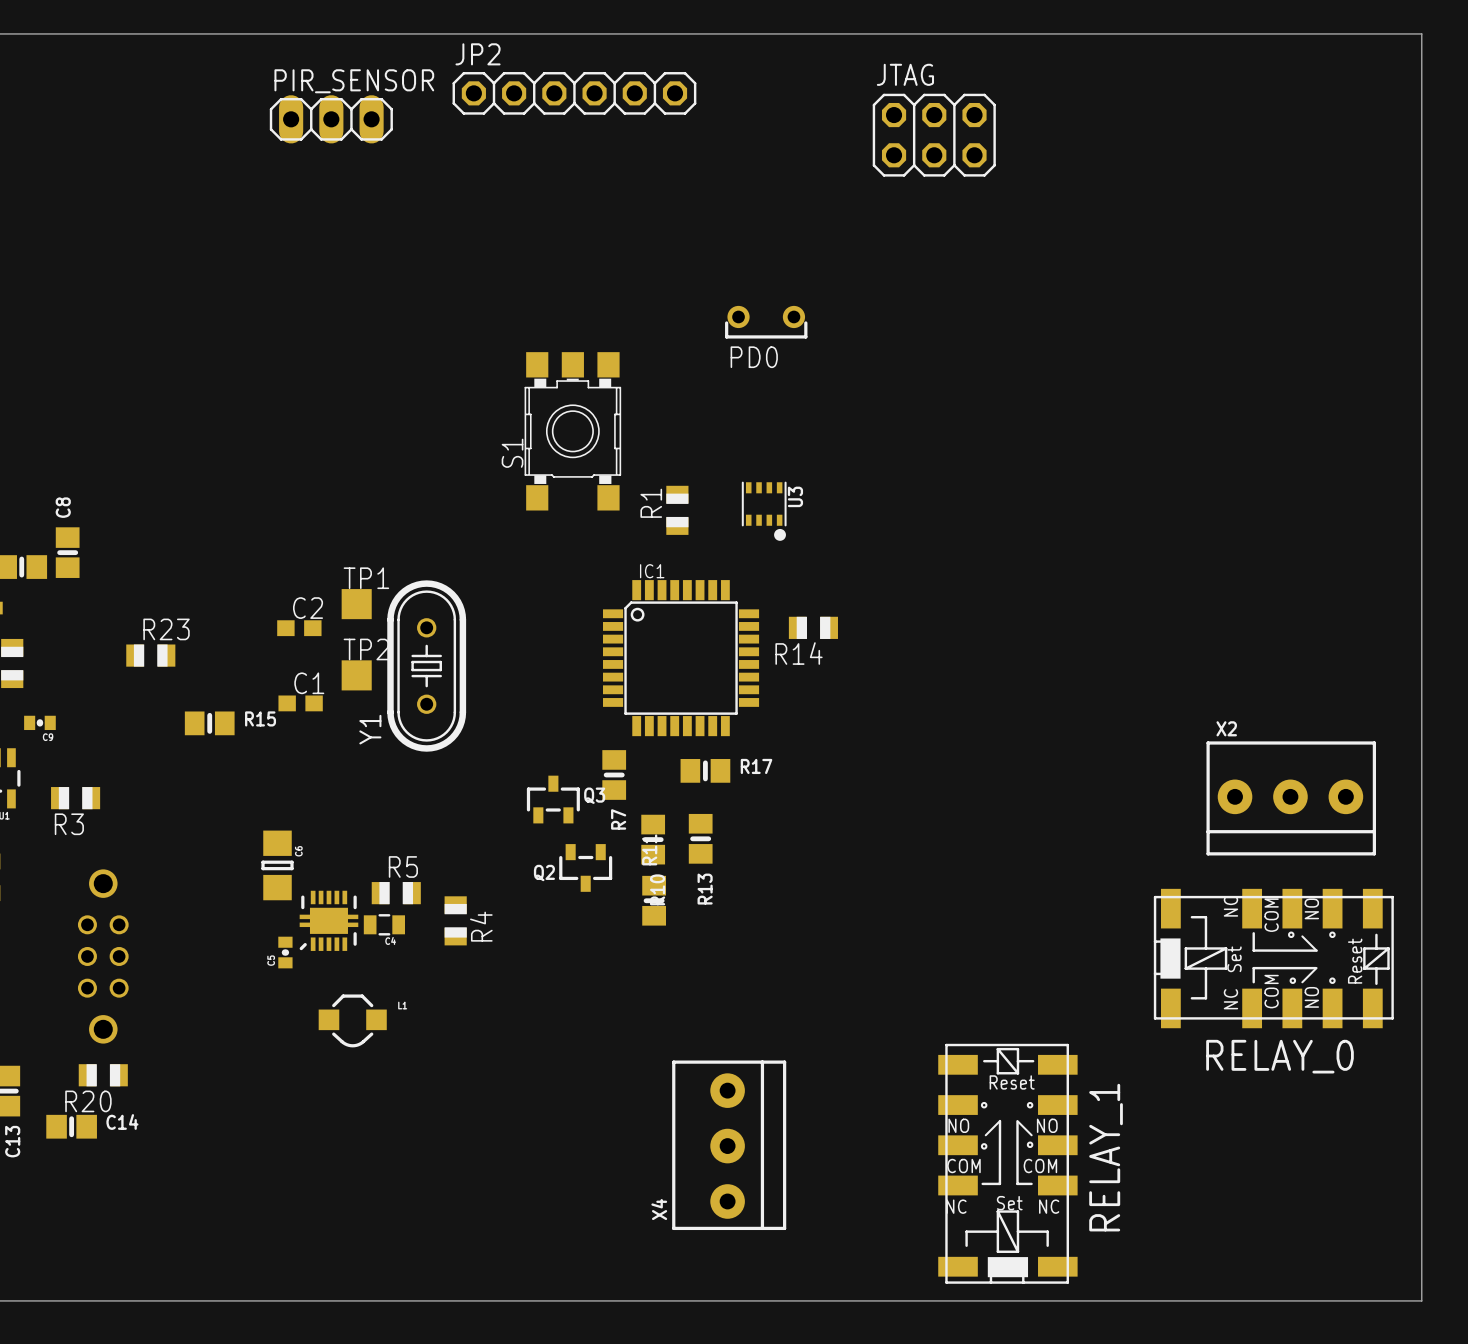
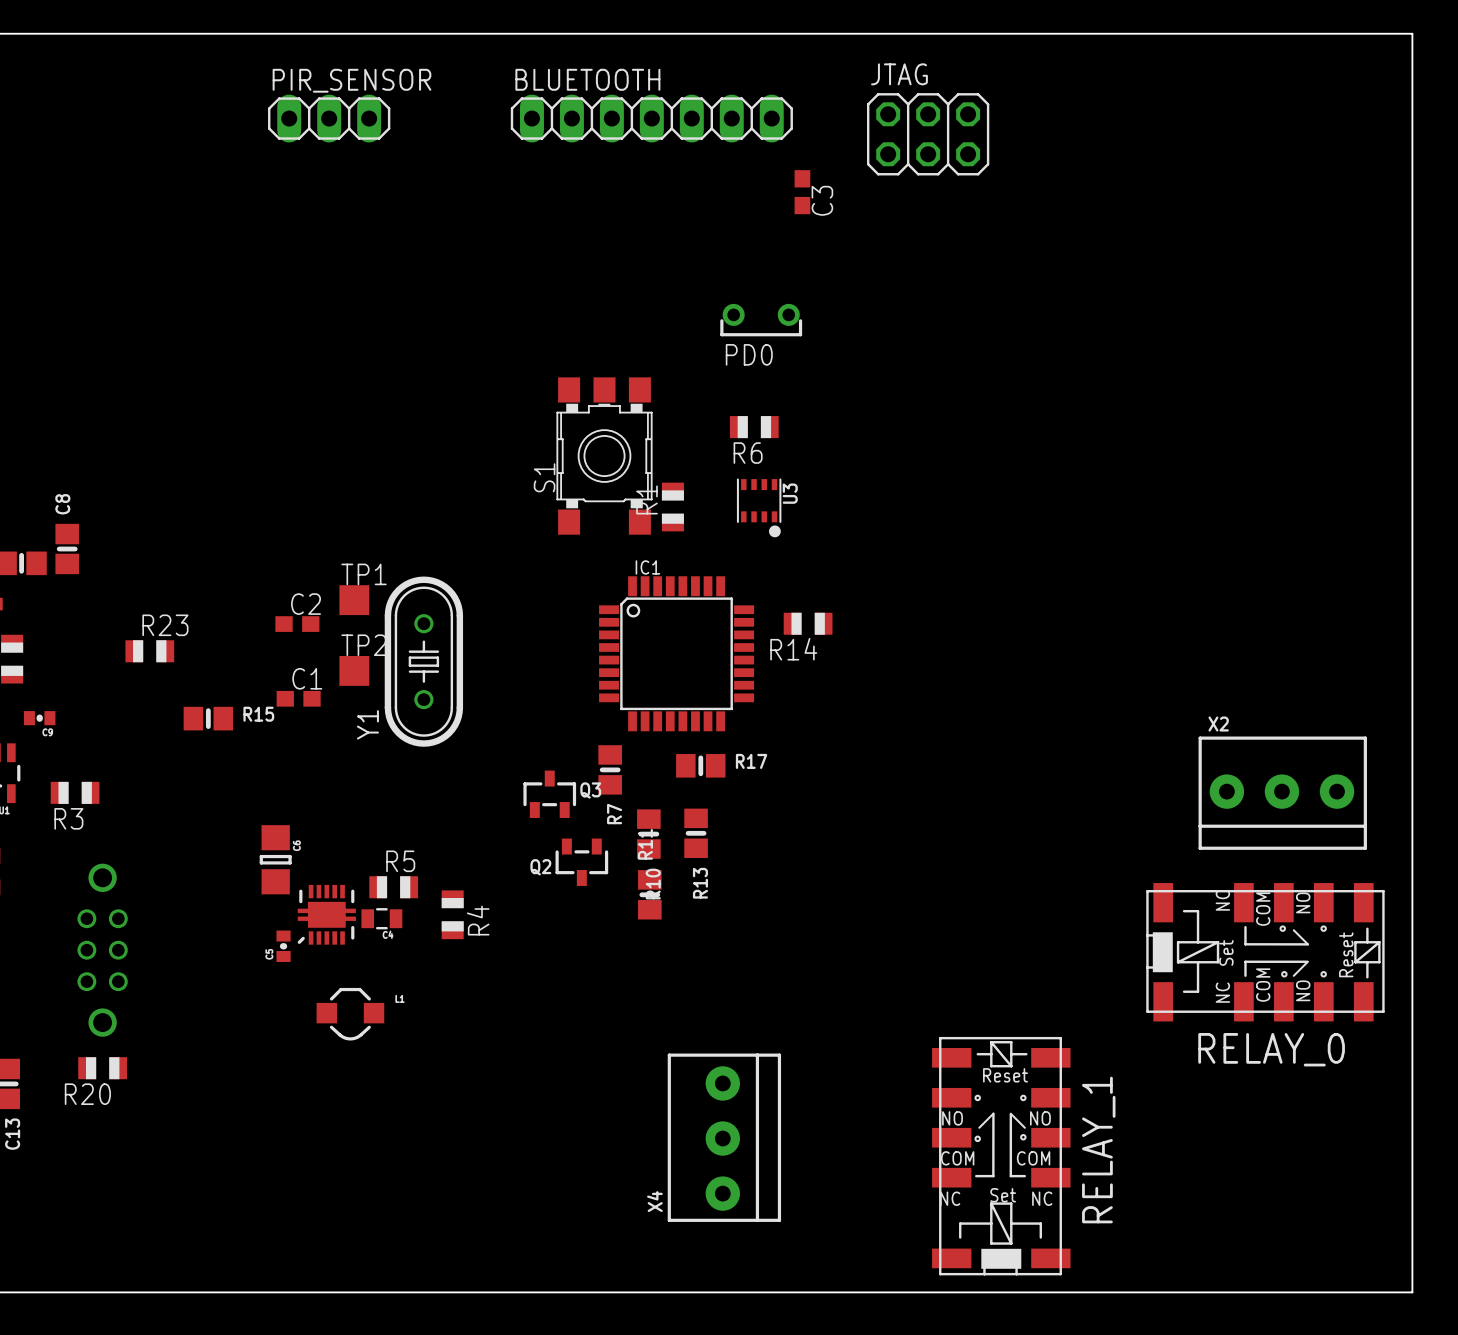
JP2: (574, 93) -> none
BLUETOOTH: none -> (651, 118)
C3: none -> (802, 192)
R6: none -> (754, 427)
S1 position: (572, 431) -> (604, 456)
C14: (71, 1126) -> none

